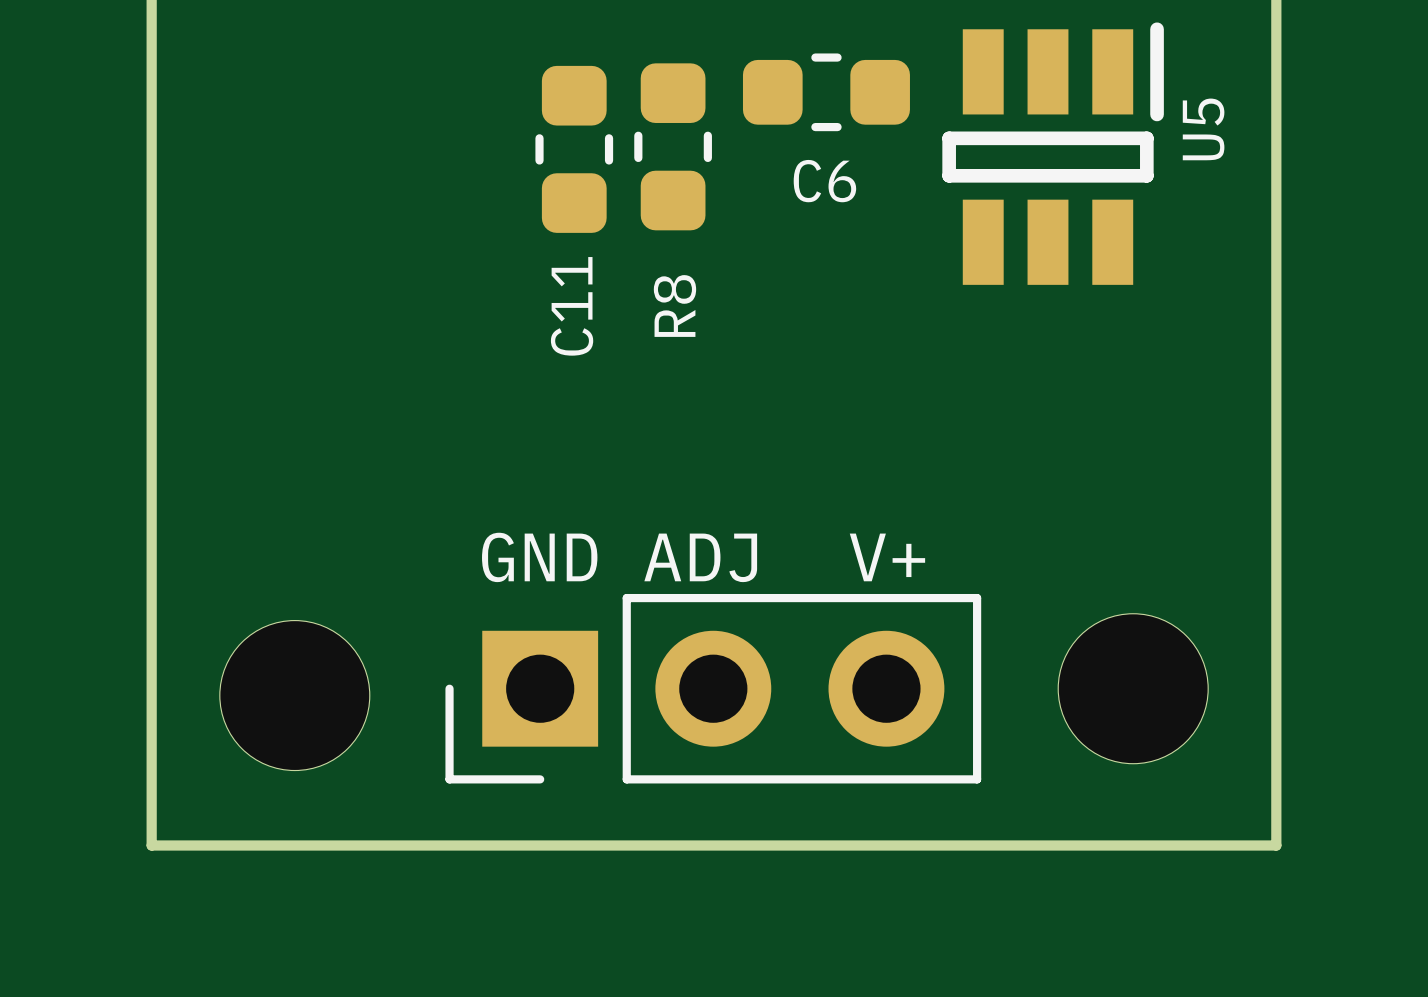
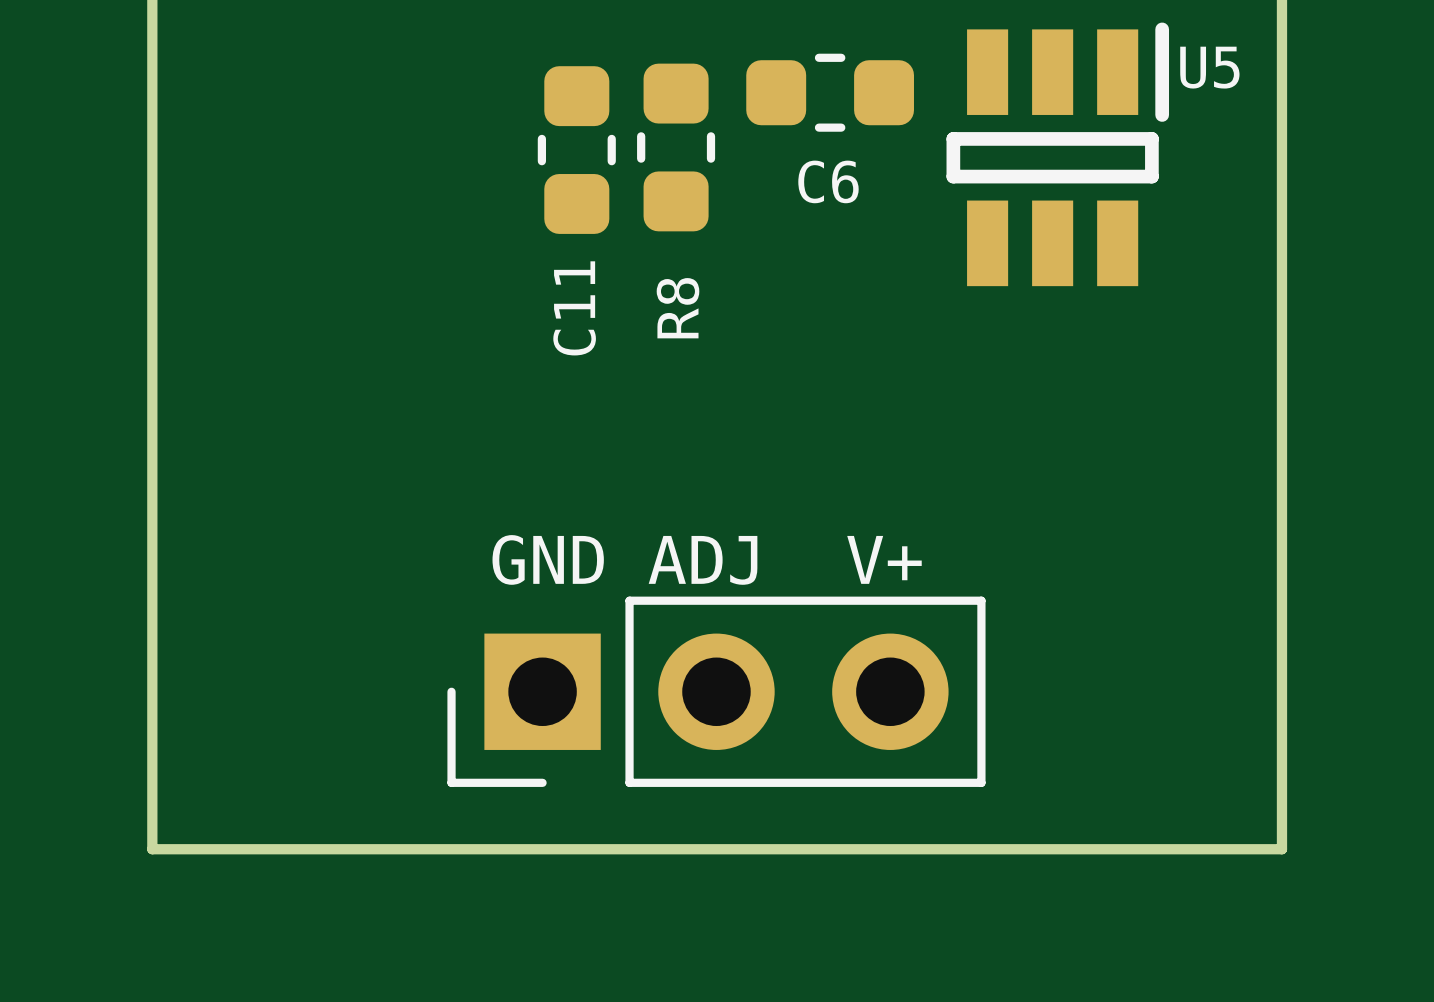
U5 name rotation: 0° (1203, 129) -> 90° clockwise (1209, 67)
part: (1133, 688) -> none
part: (294, 695) -> none

